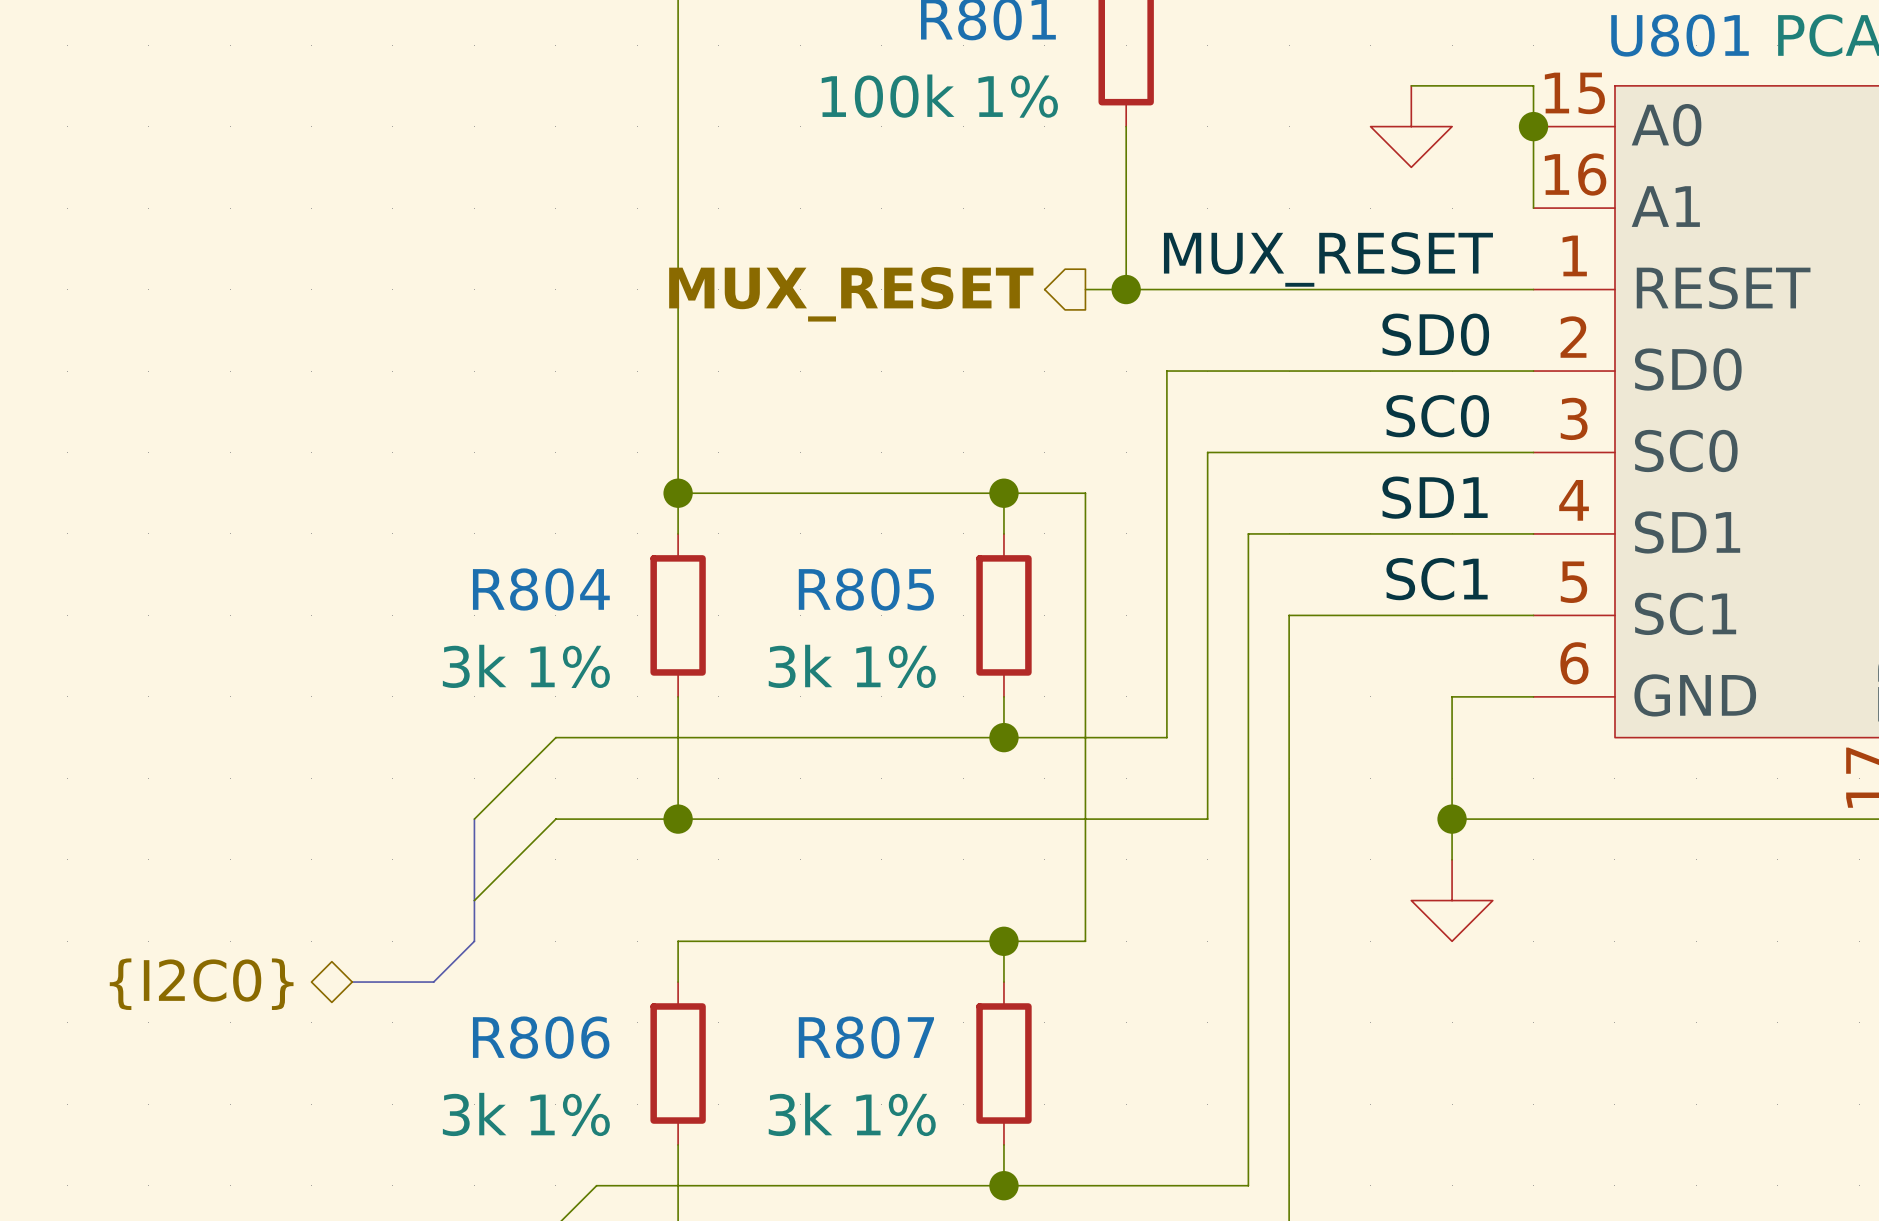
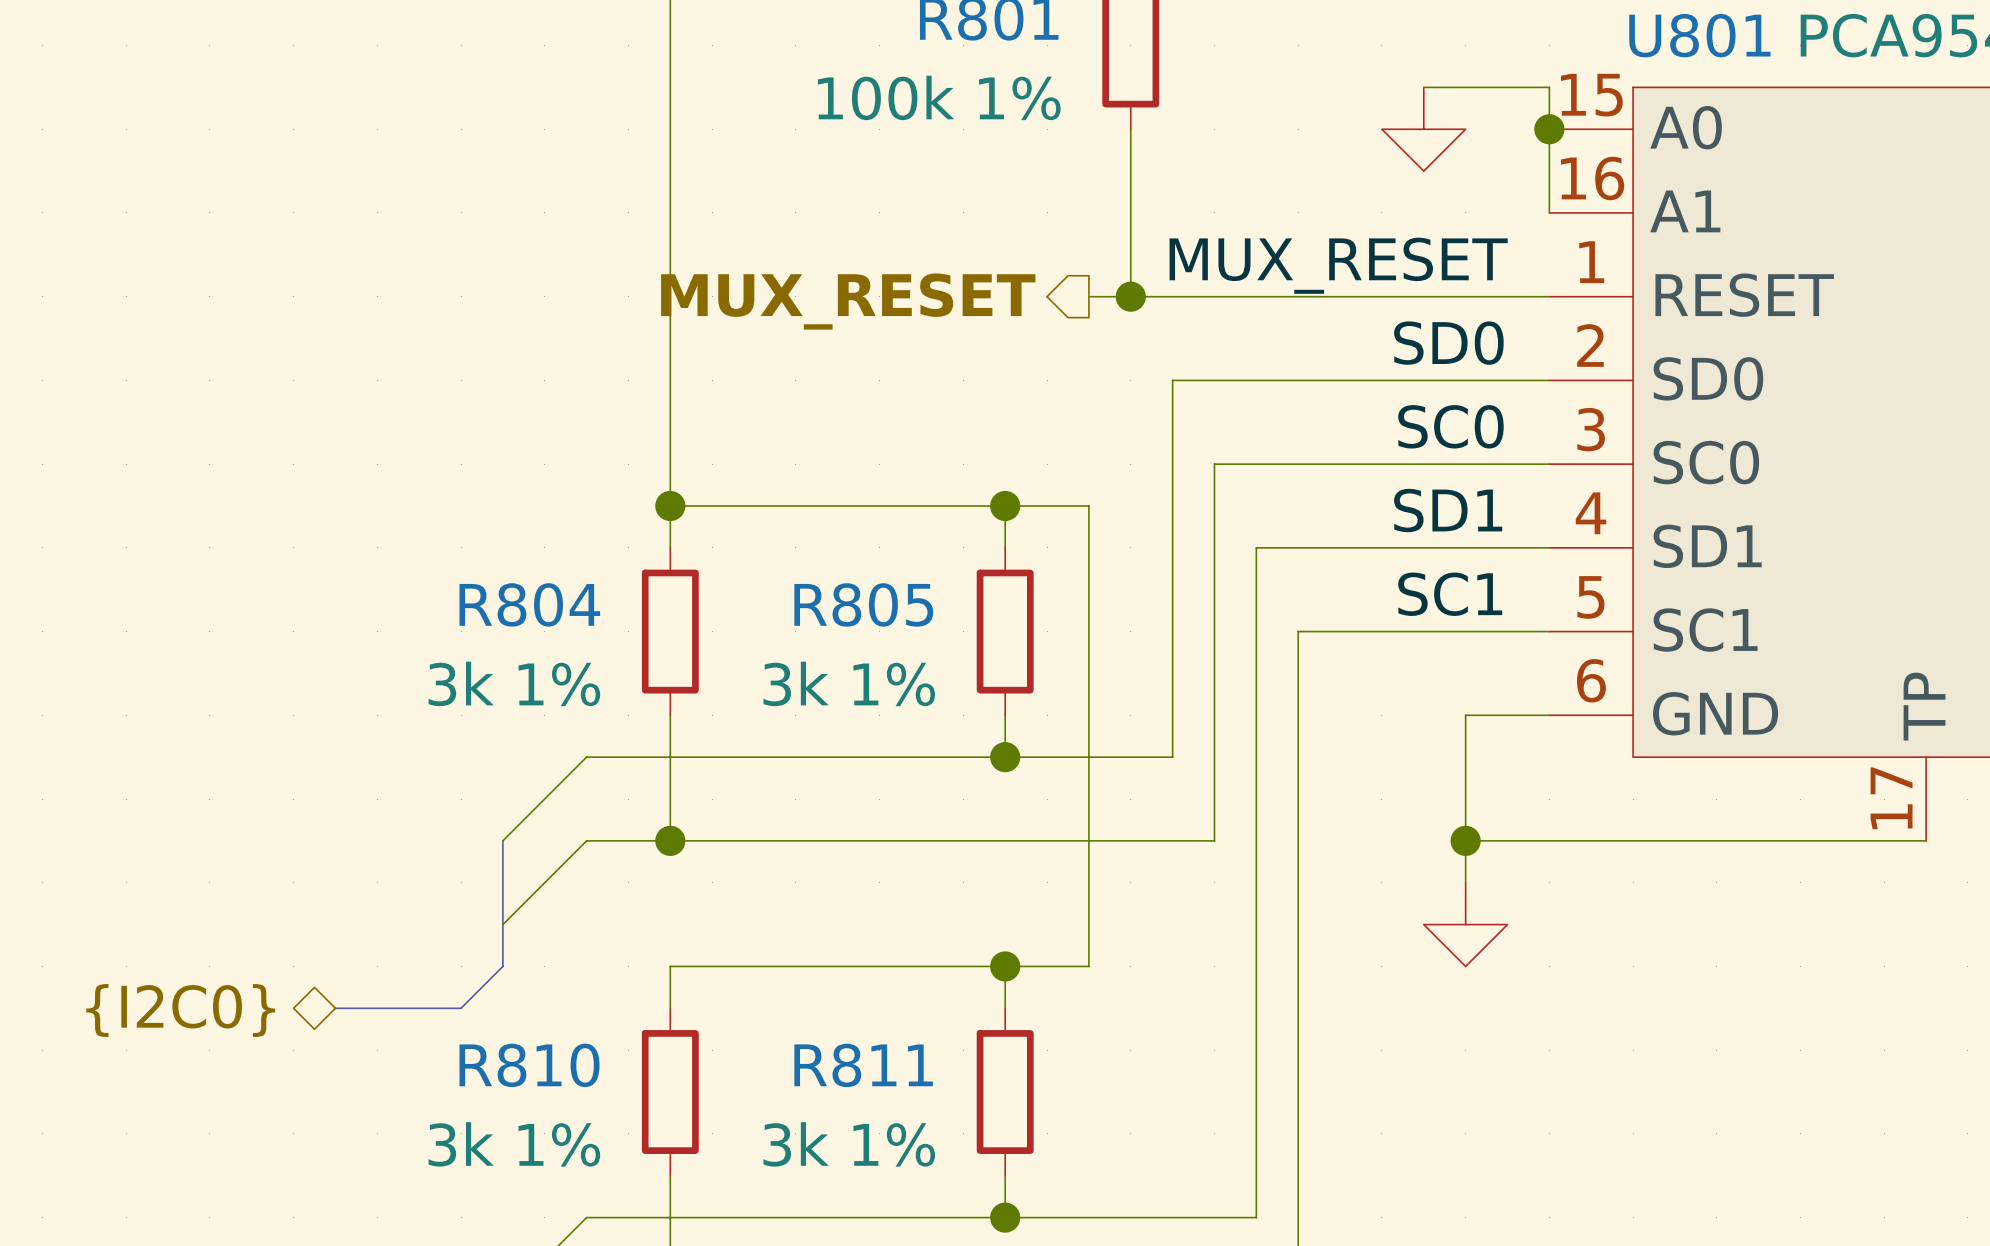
wire: (596, 737) (555, 737) (474, 819) -> (586, 757) (502, 840)
bus: (474, 819) (474, 941) (433, 982) -> (502, 840) (502, 966) (461, 1008) (419, 1008)
wire: (596, 819) (555, 819) (474, 900) -> (586, 840) (502, 924)
R806 name: R806 (541, 1037) -> R810 (529, 1065)
R807 name: R807 (866, 1037) -> R811 (863, 1065)

